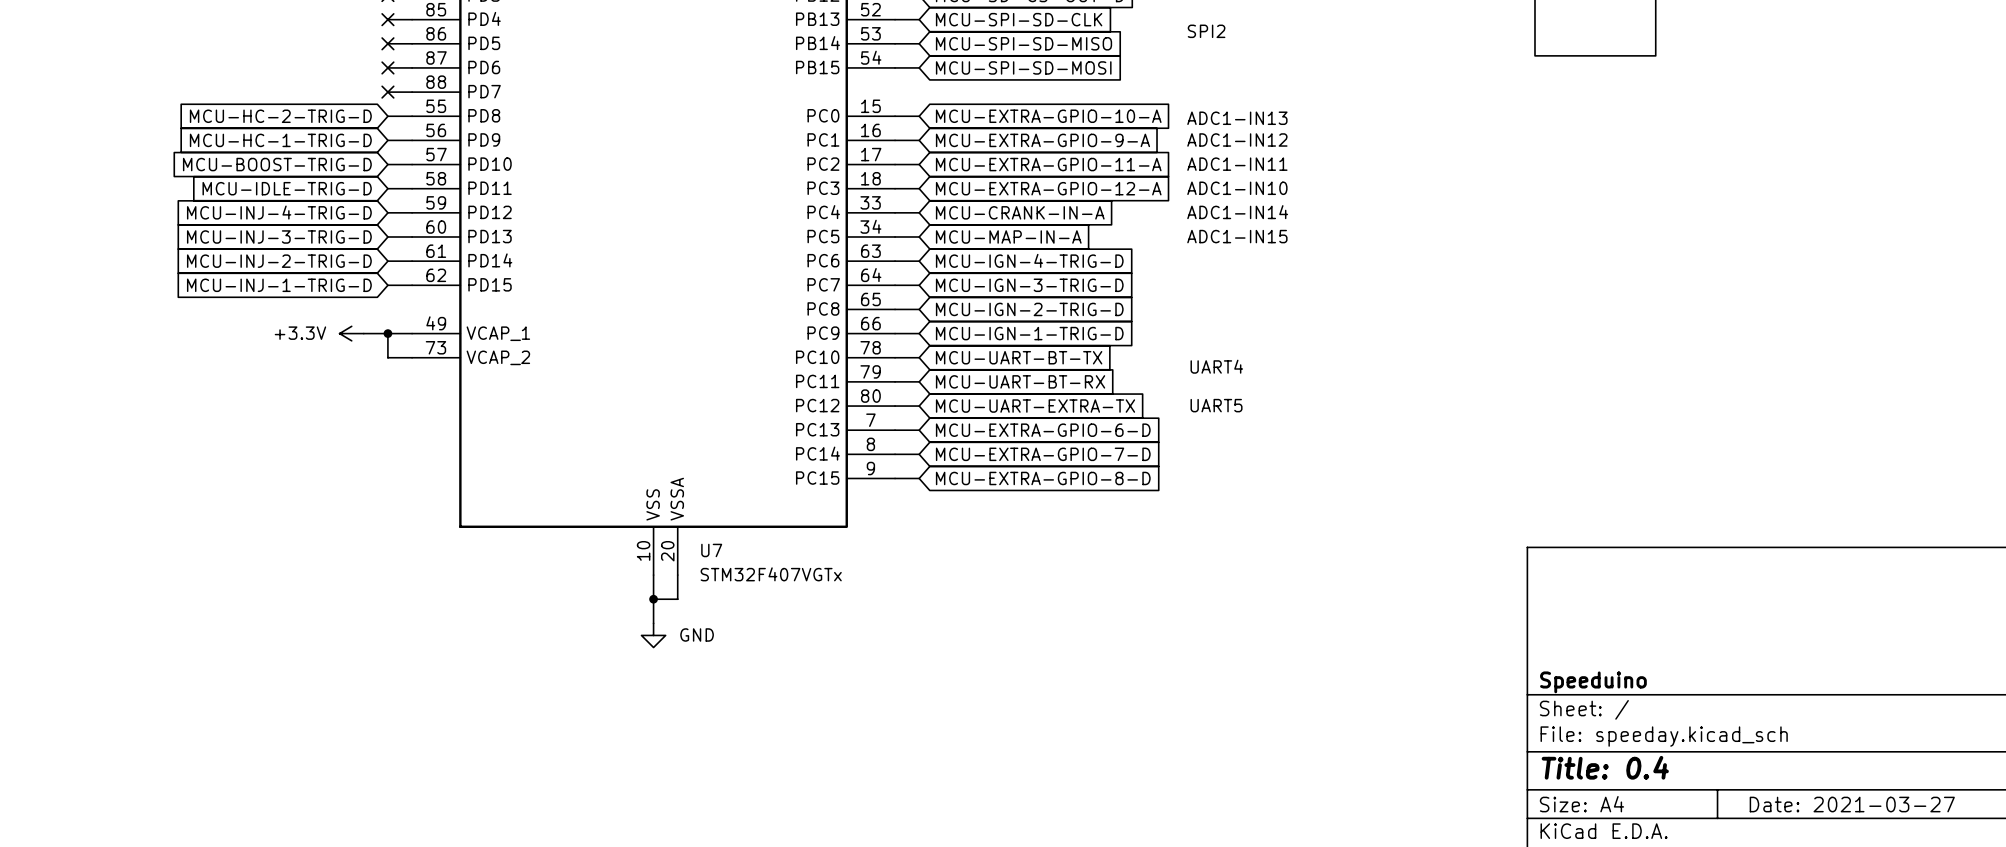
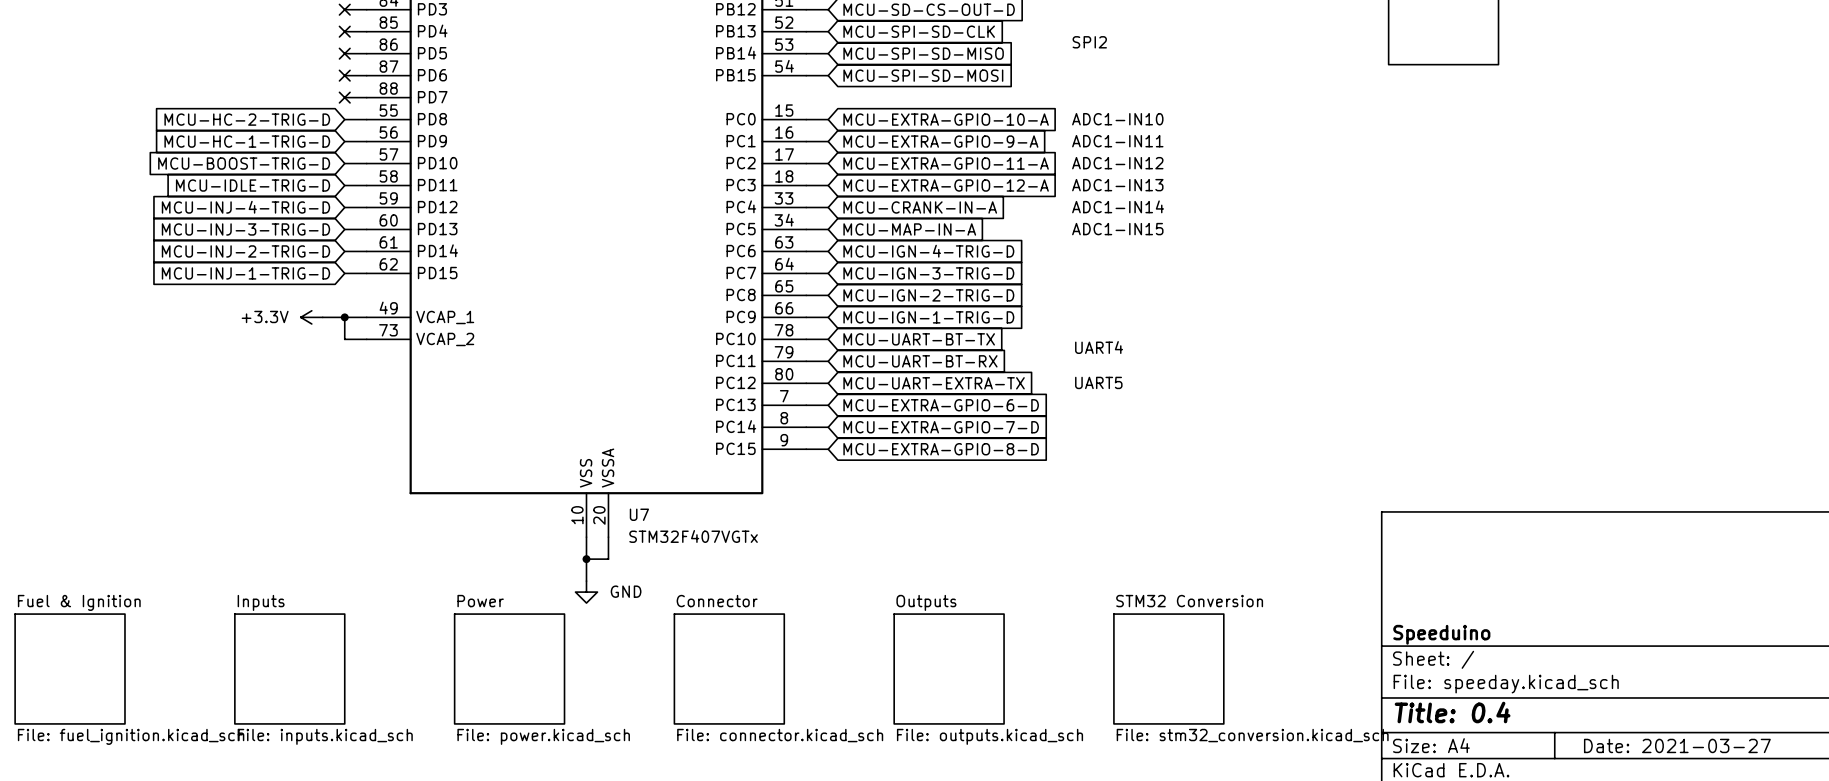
text: ADC1-IN13 (1237, 118) -> ADC1-IN10 (1117, 119)
text: ADC1-IN12 (1237, 139) -> ADC1-IN11 (1117, 141)
text: ADC1-IN11 (1237, 164) -> ADC1-IN12 (1117, 163)
text: ADC1-IN10 (1237, 188) -> ADC1-IN13 (1117, 185)
sheet Fuel & Ignition: none -> File: fuel_ignition.kicad_sch (70, 669)
sheet Inputs: none -> File: inputs.kicad_sch (289, 669)
sheet Power: none -> File: power.kicad_sch (509, 669)
sheet Connector: none -> File: connector.kicad_sch (729, 669)
sheet Outputs: none -> File: outputs.kicad_sch (949, 669)
sheet STM32 Conversion: none -> File: stm32_conversion.kicad_sch (1168, 669)

